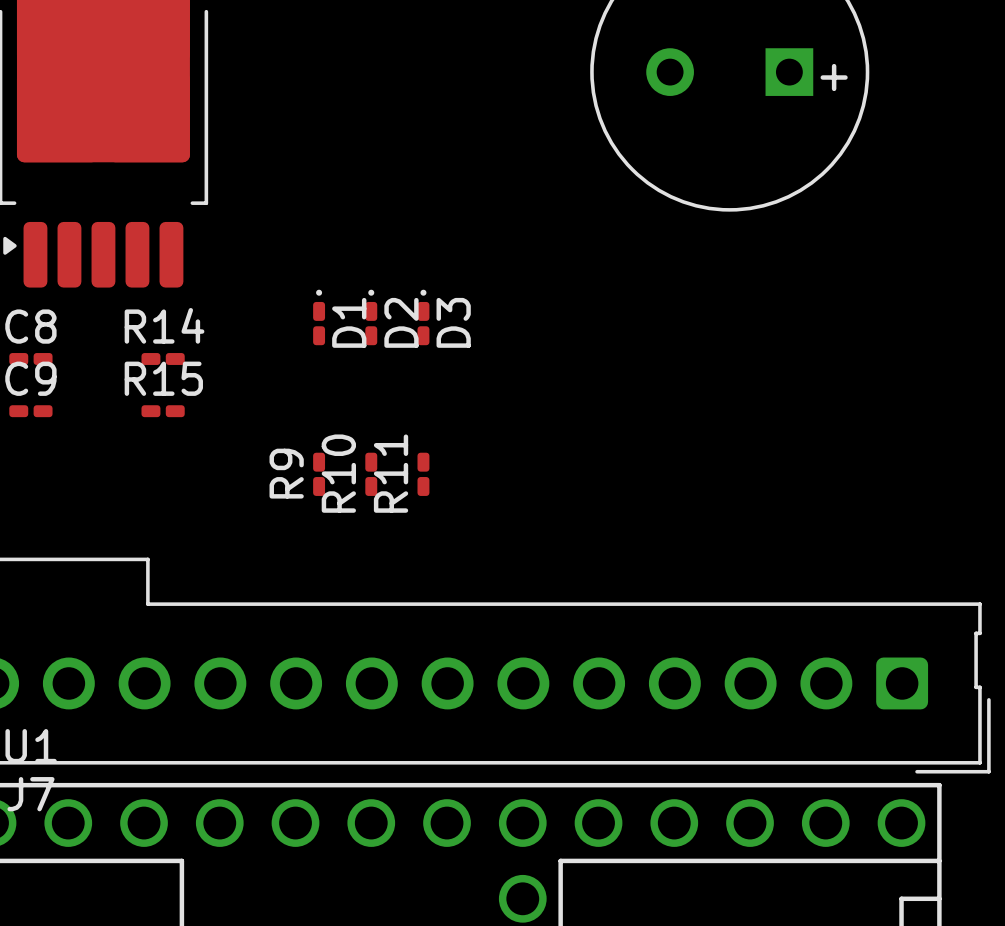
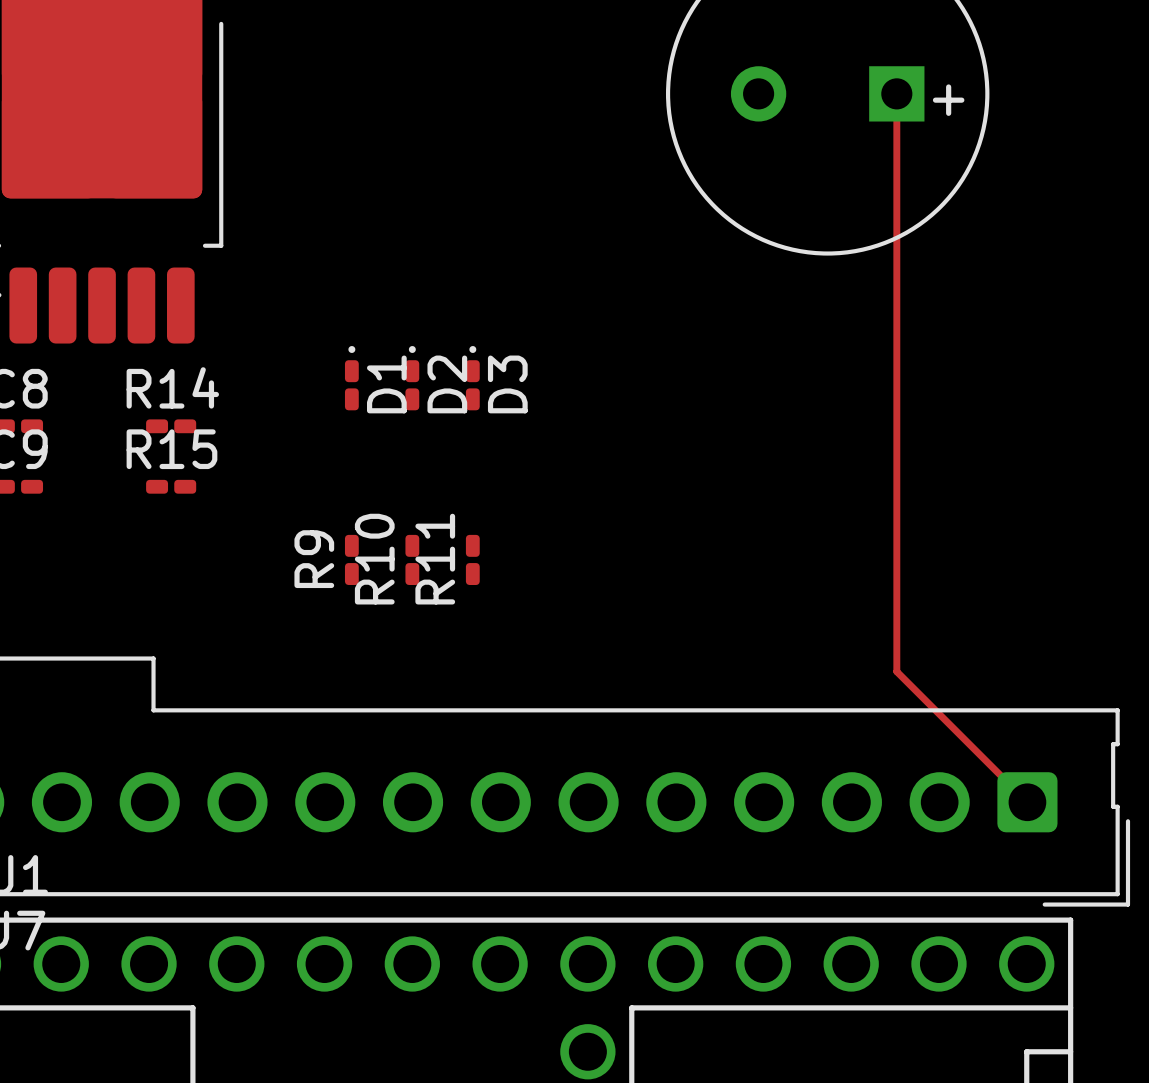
track: none -> (896, 93) (896, 671) (1027, 802)

